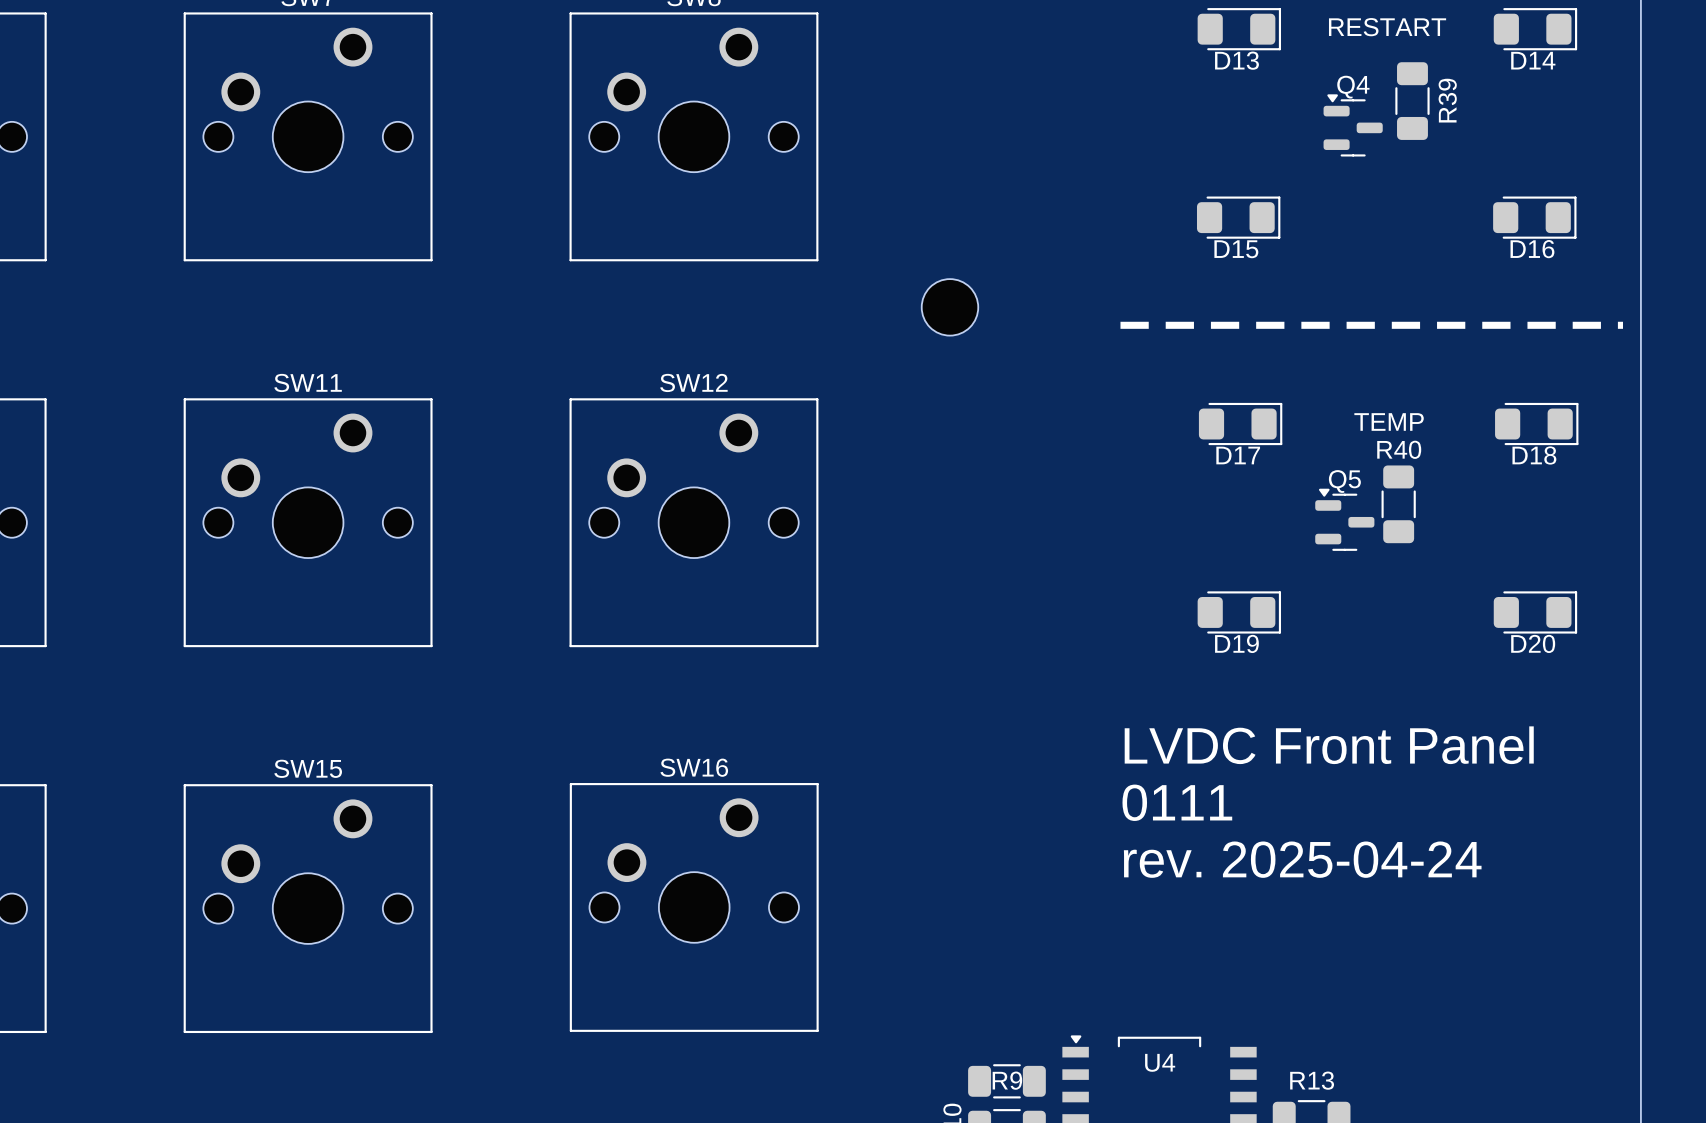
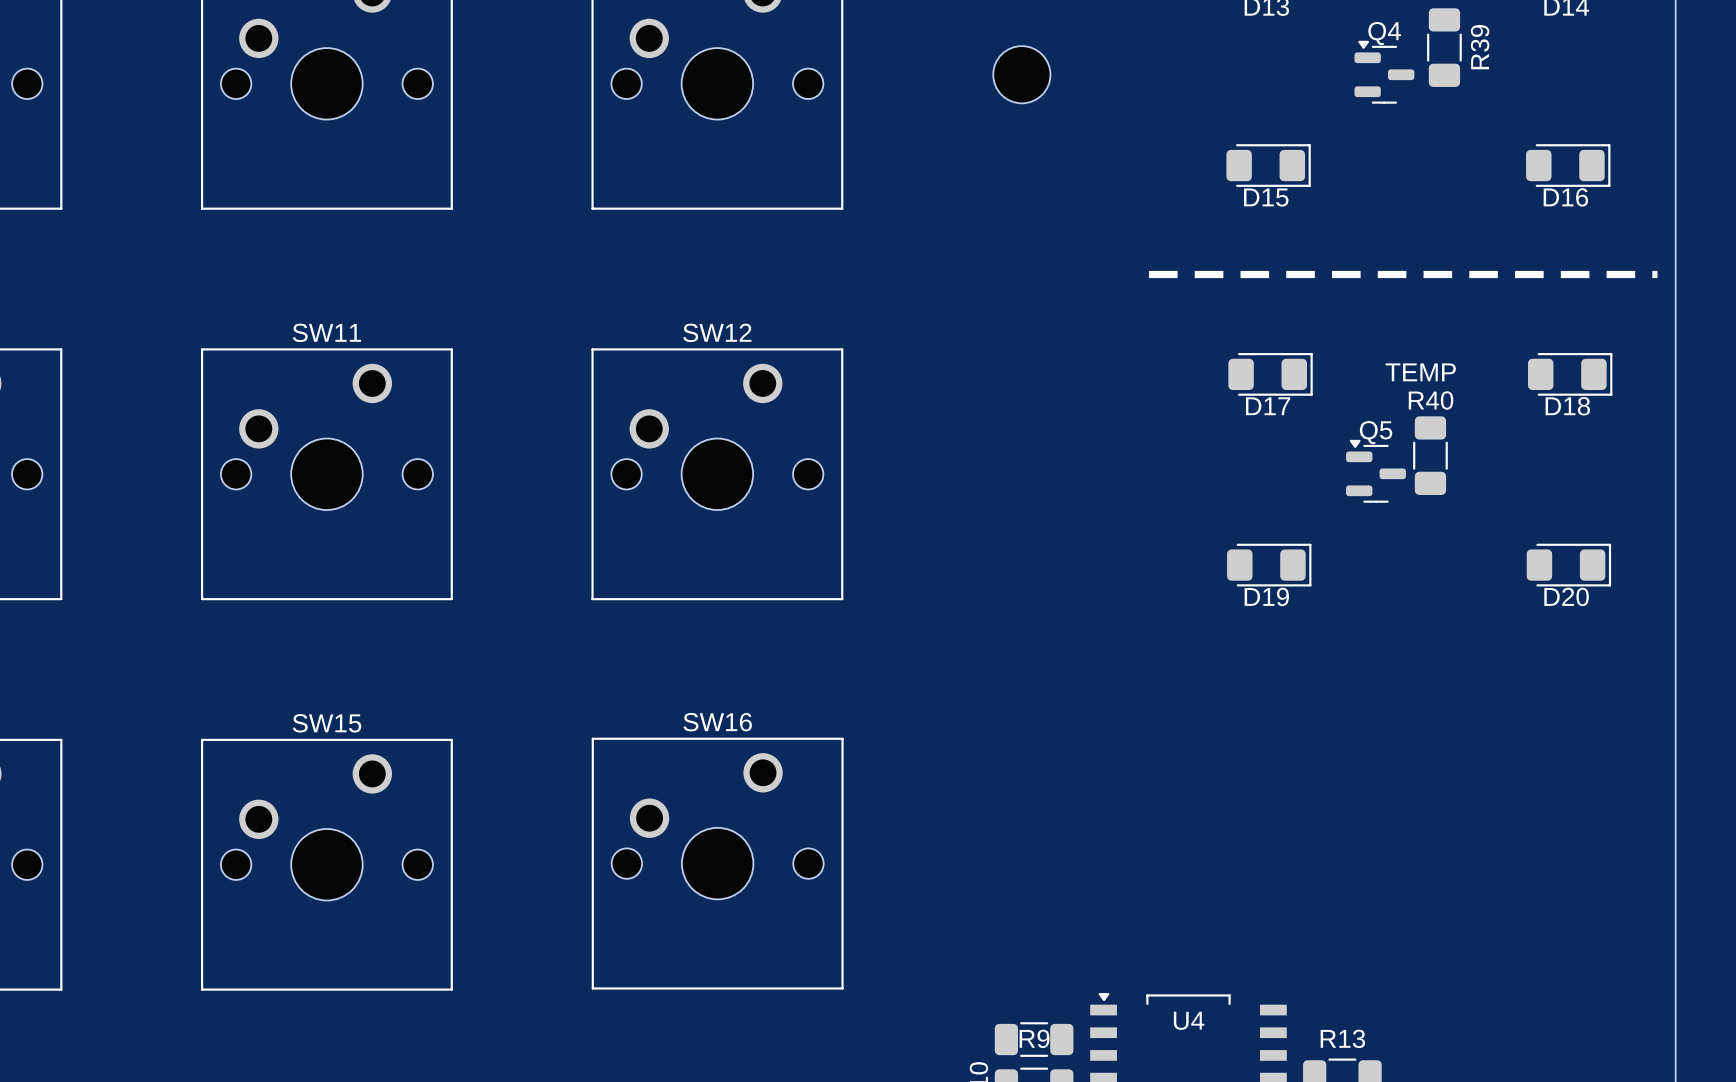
part position: (949, 307) -> (1021, 74)
text: LVDC Front Panel (1329, 745) -> none
text: 0111 (1177, 802) -> none
text: rev. 2025-04-24 (1302, 859) -> none

